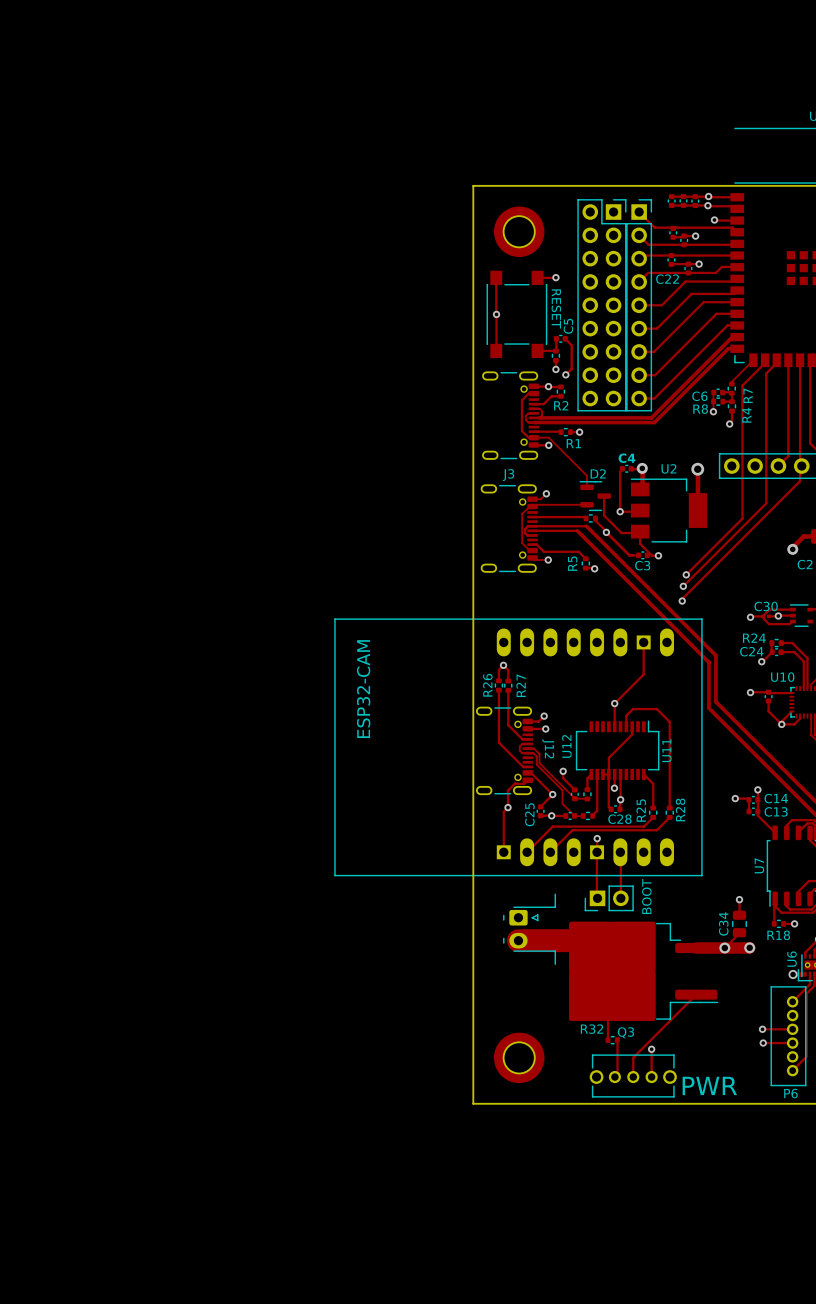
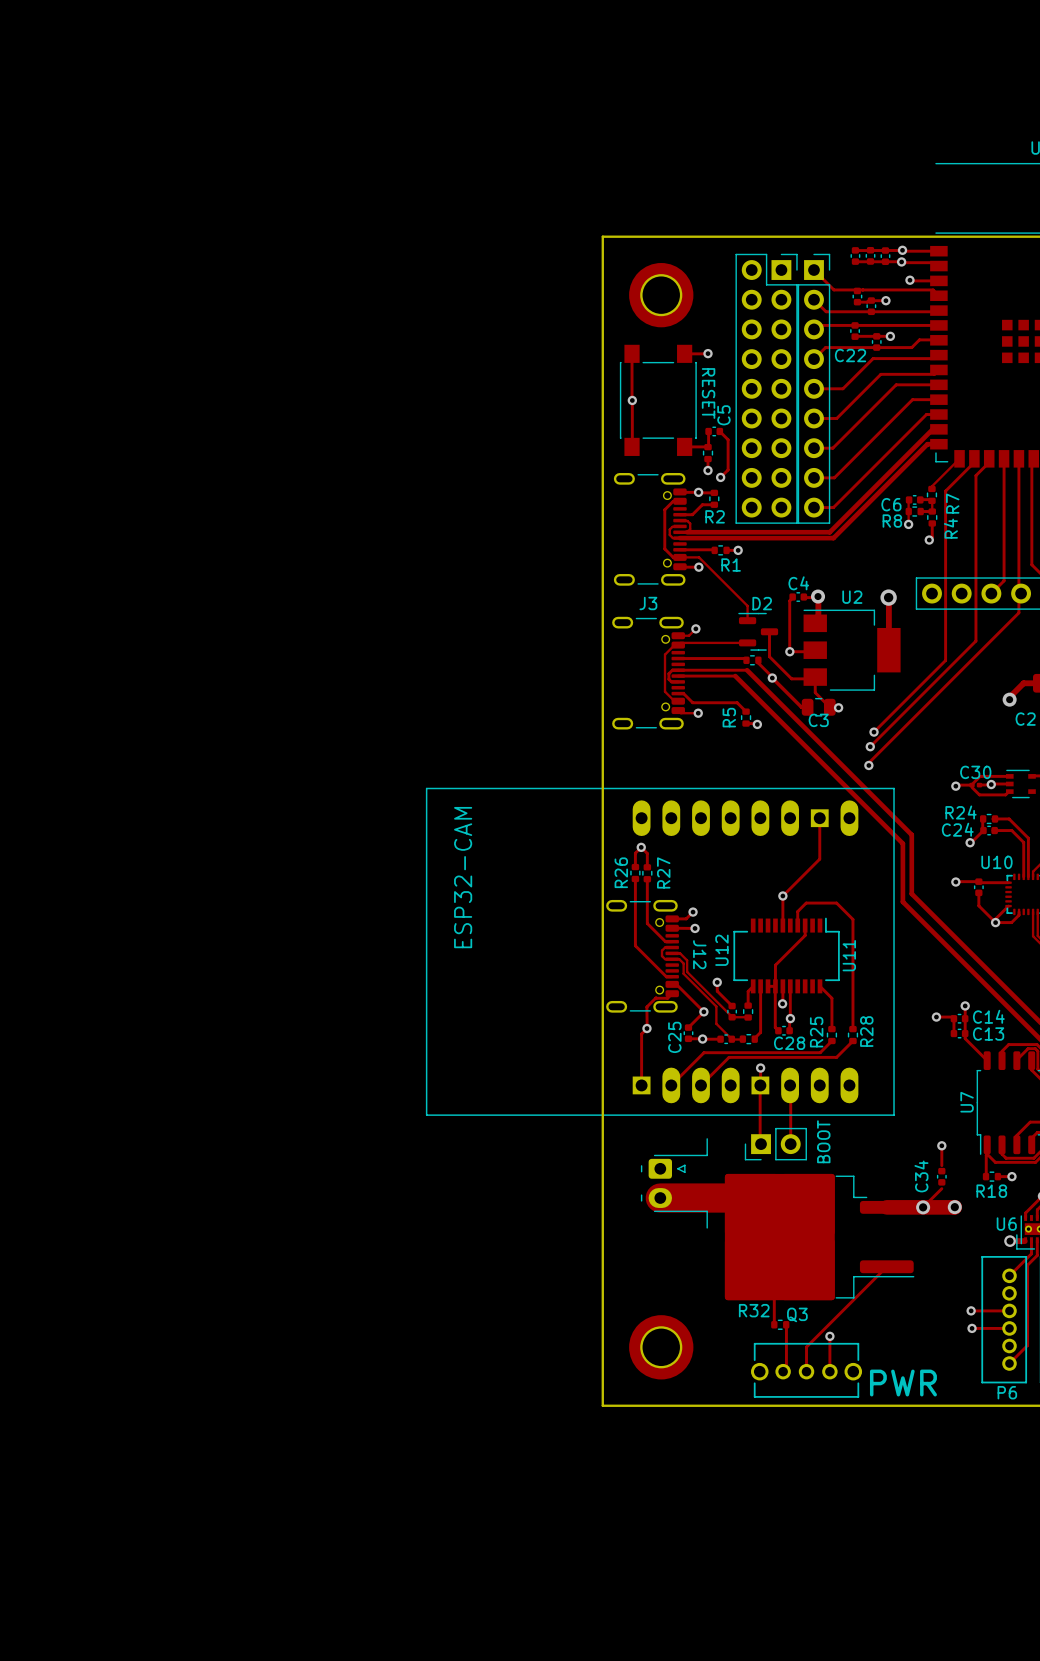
C3 footprint: [635, 551, 650, 560] -> [801, 697, 836, 717]
C34 footprint: [732, 910, 747, 938] -> [936, 1167, 947, 1186]
U6 name rotation: 0° (791, 959) -> 90° clockwise (1006, 1224)

